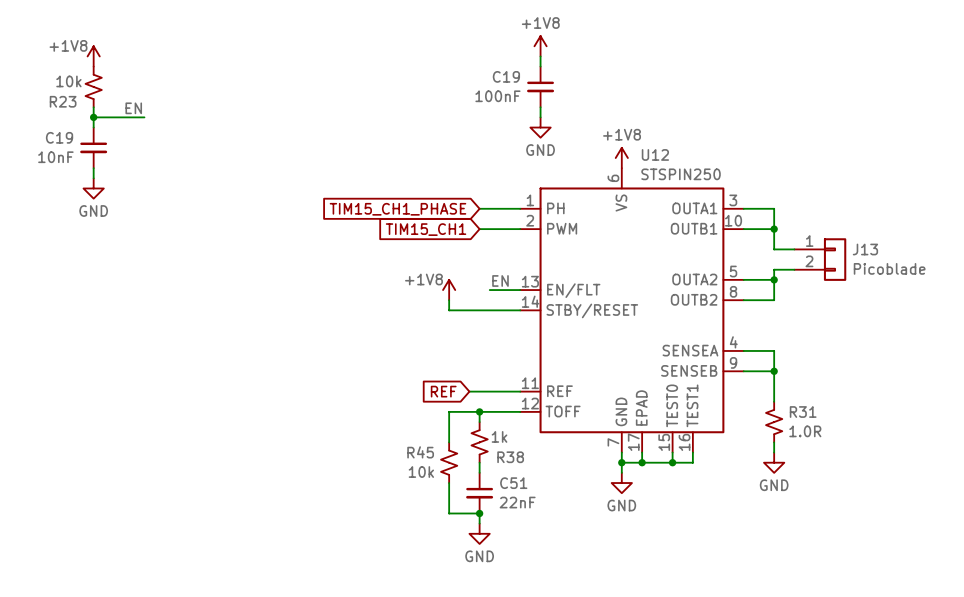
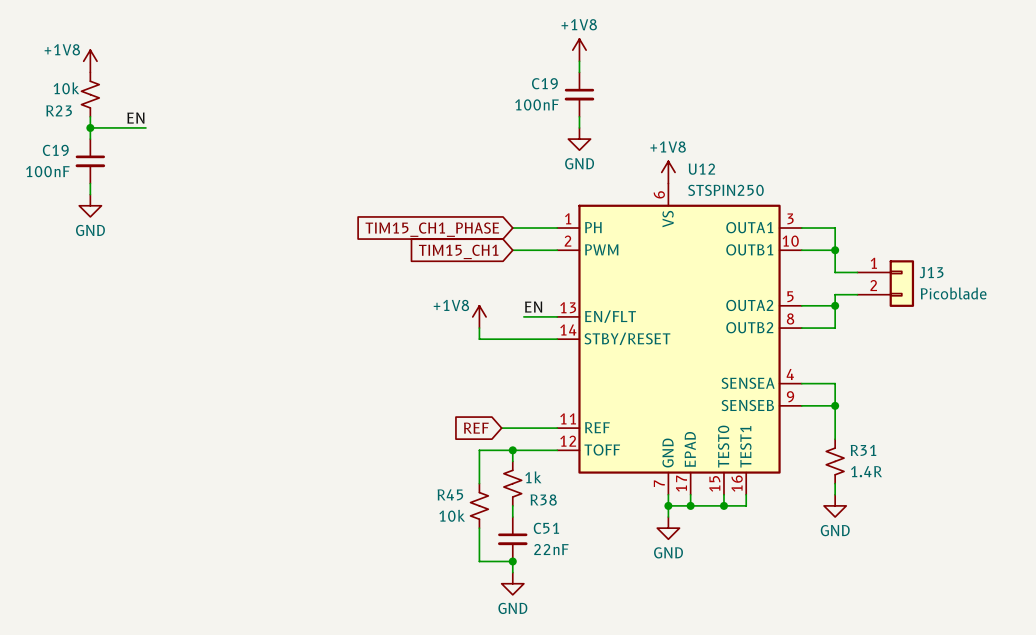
C19 value: 10nF (55, 157) -> 100nF (47, 171)
R31 value: 1.0R (805, 431) -> 1.4R (866, 471)

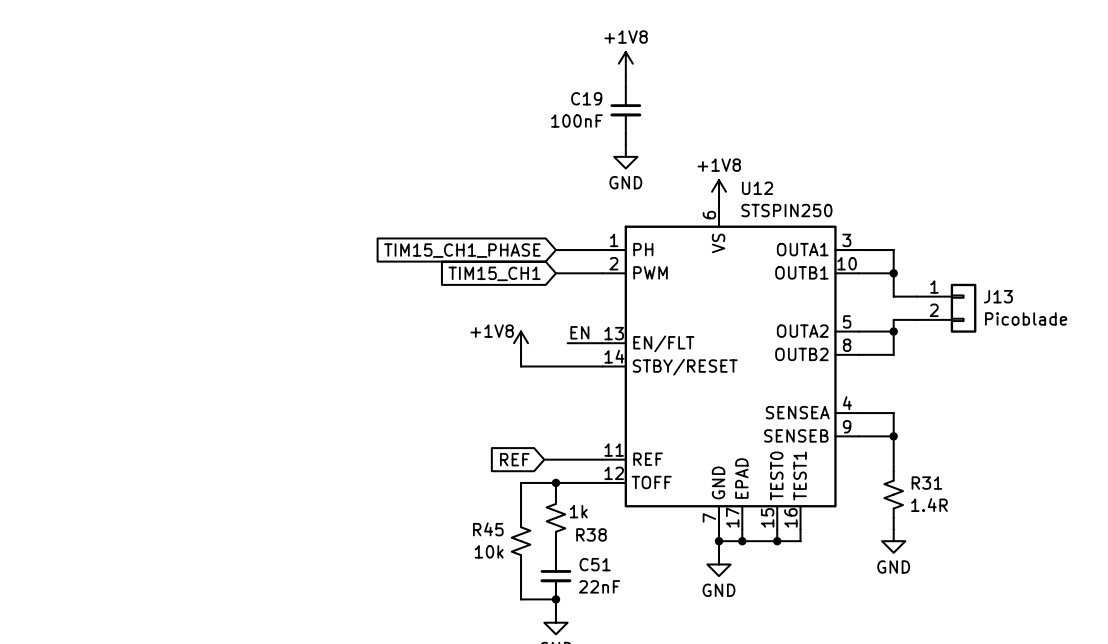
power symbol: +1V8 (90, 61) -> none
R23: 10k (90, 94) -> none
wire: (90, 116) (90, 139) -> none
label: EN (135, 118) -> none
wire: (90, 127) (145, 127) -> none
junction: (90, 127) -> none
C19: 100nF (90, 161) -> none
wire: (90, 183) (90, 194) -> none
power symbol: GND (90, 205) -> none

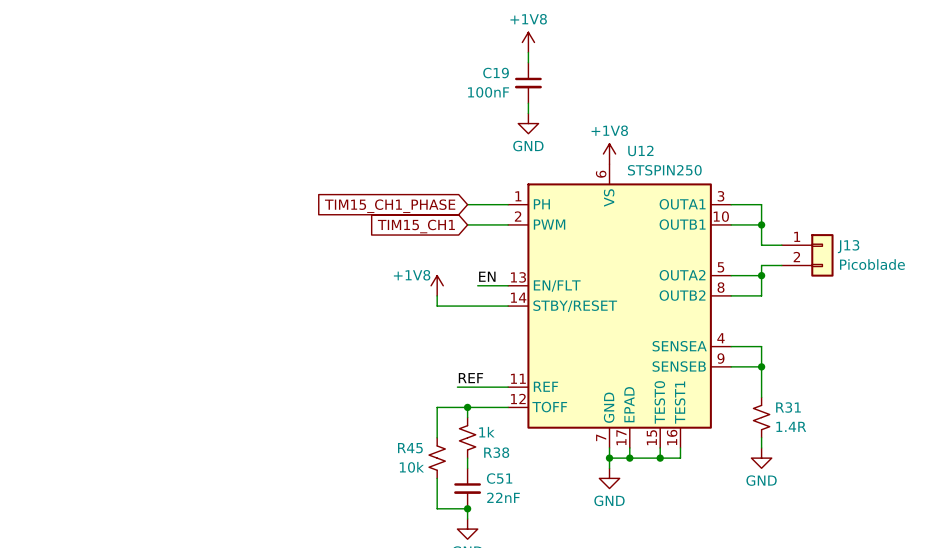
label: none -> REF (470, 378)
global label: REF (514, 459) -> none

